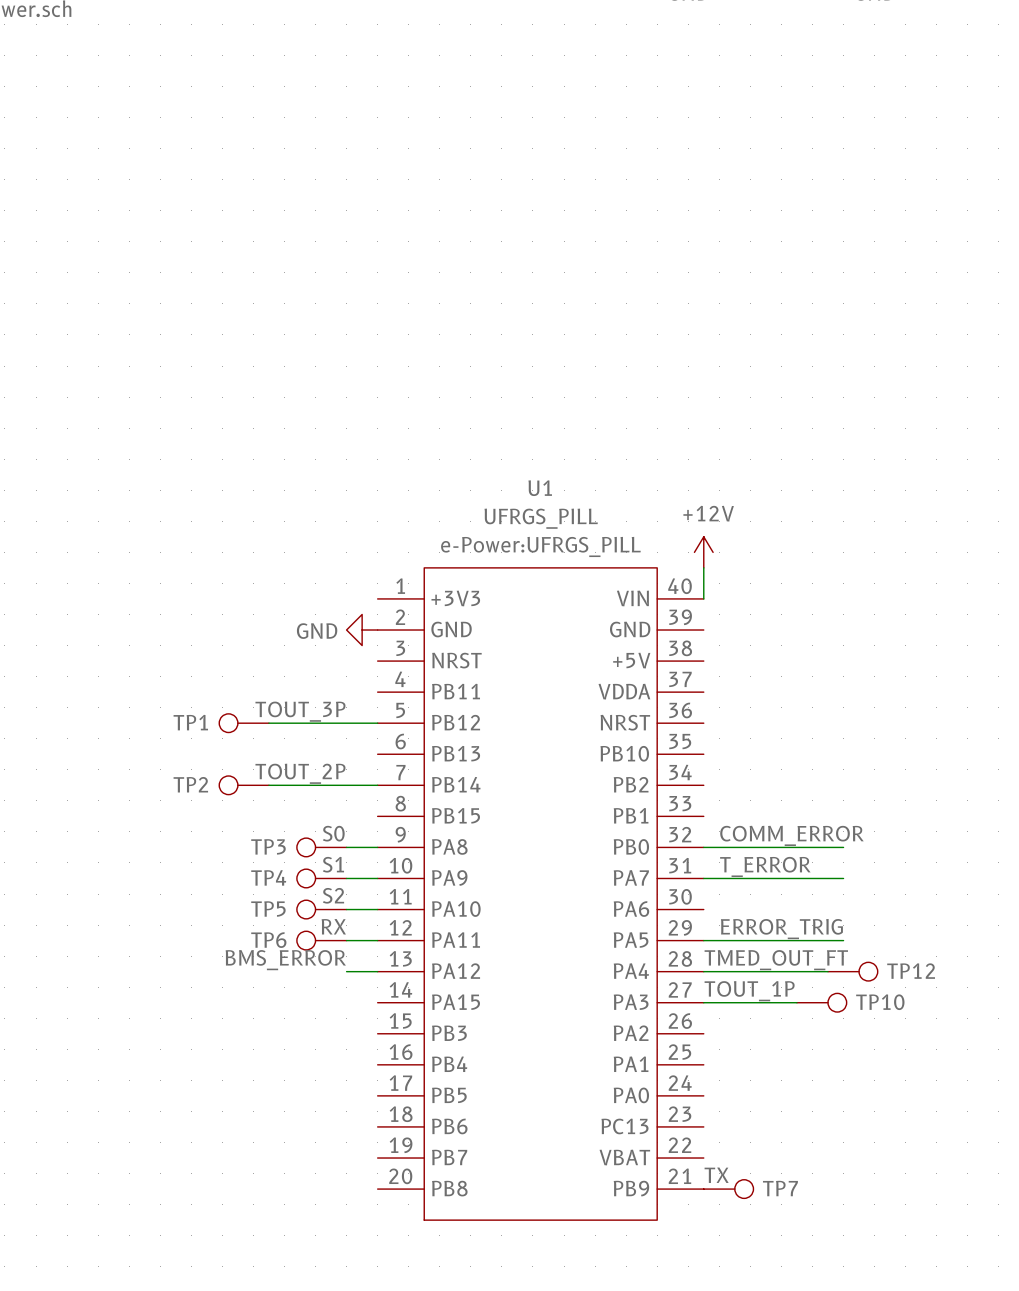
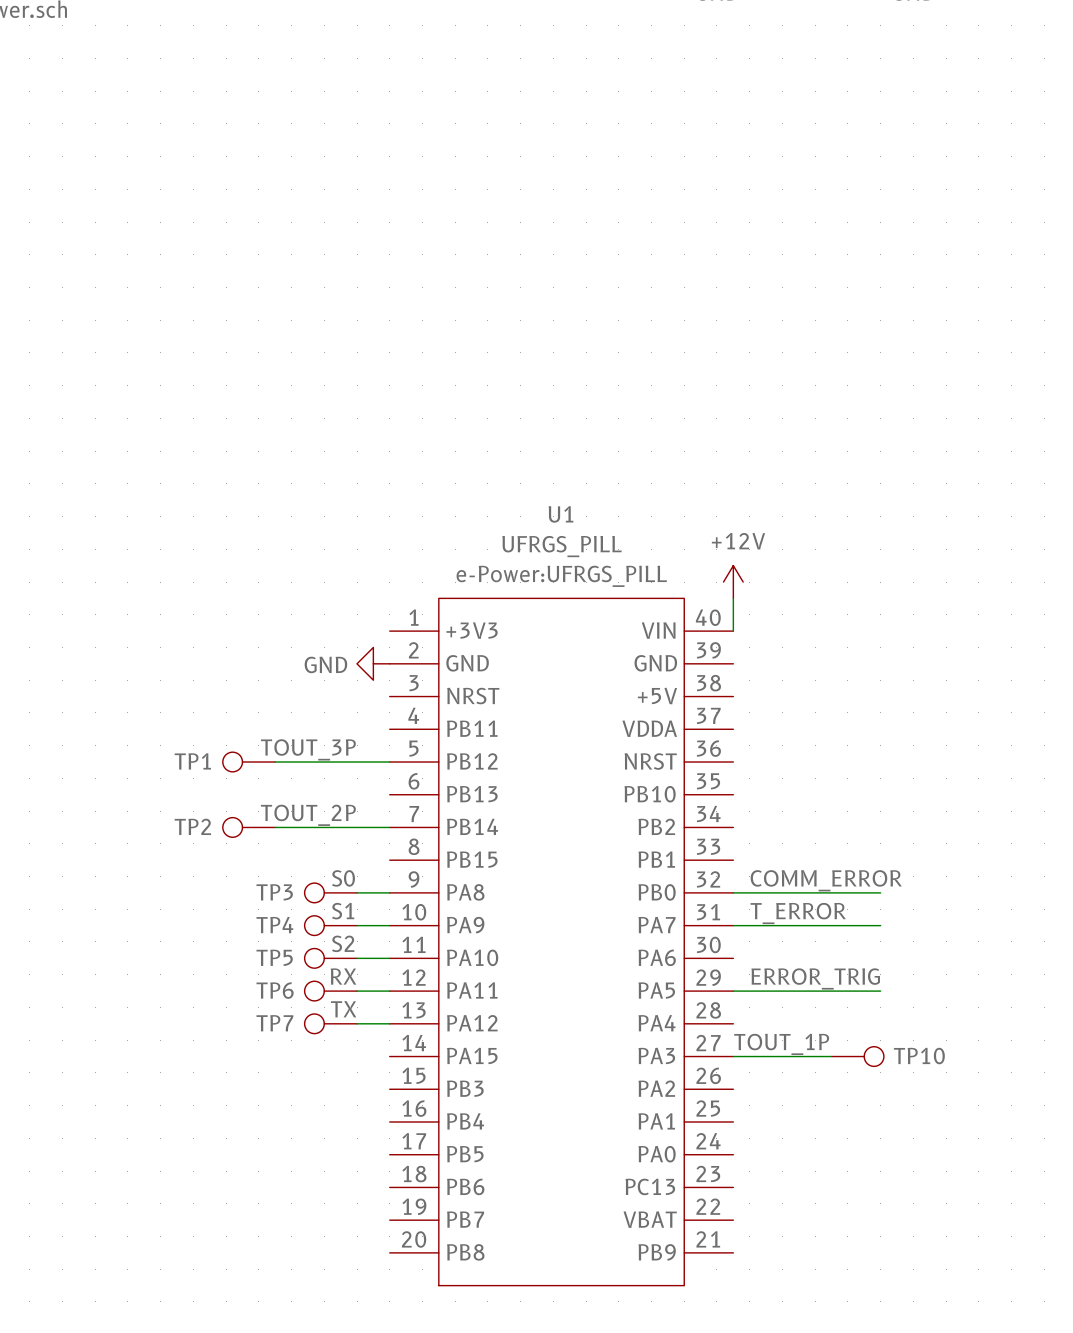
label: BMS_ERROR (285, 960) -> TX (343, 1009)
label: TMED_OUT_FT (776, 960) -> none
wire: (703, 971) (828, 971) -> none
TP12: (852, 971) -> none
label: TX (716, 1175) -> none
TP7 position: (728, 1189) -> (330, 1023)
TP7 rotation: 0° (744, 1189) -> 180° (314, 1023)

